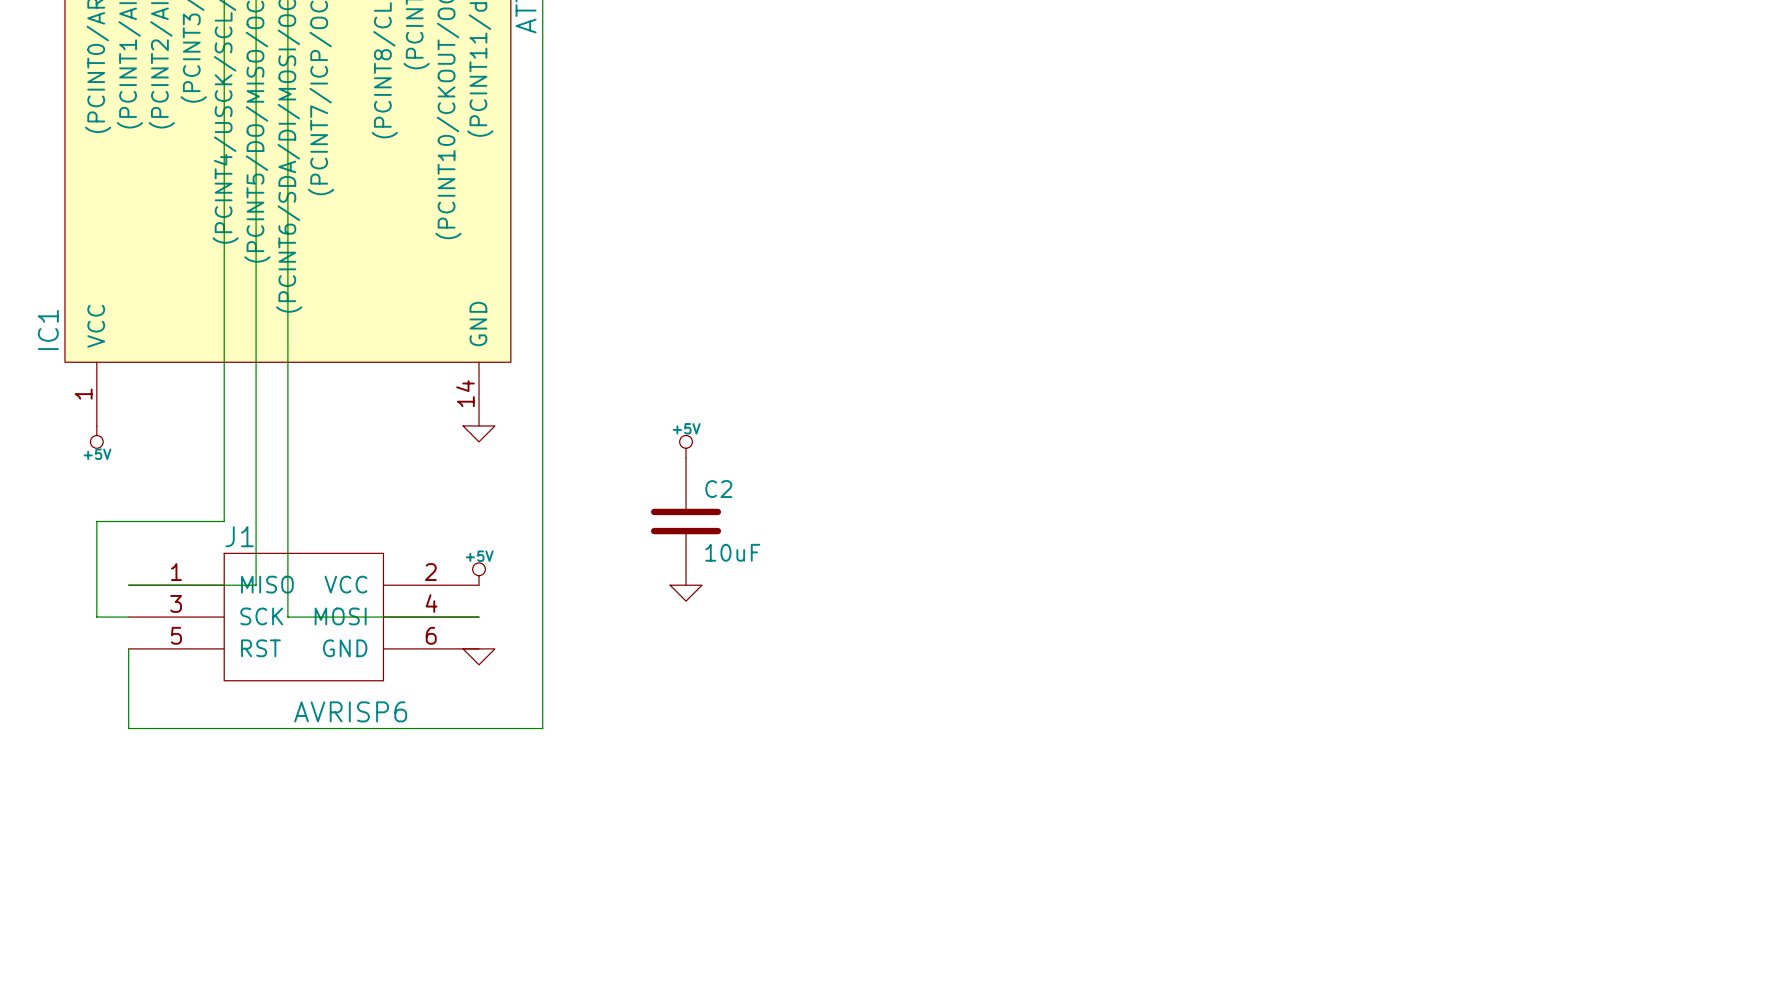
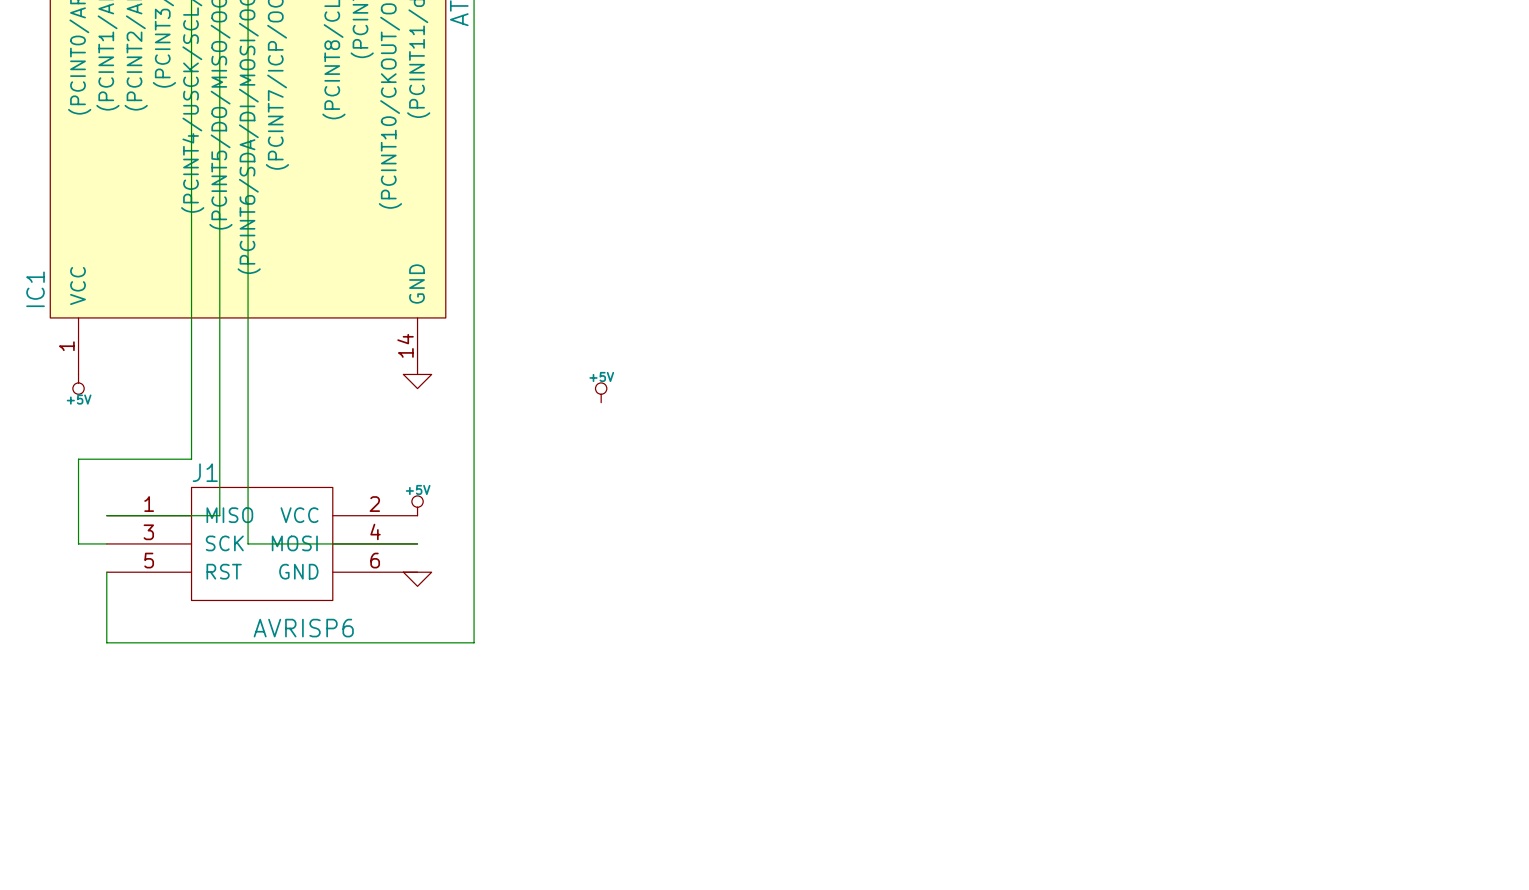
C2: 10uF (686, 521) -> none
power symbol: (686, 593) -> none

